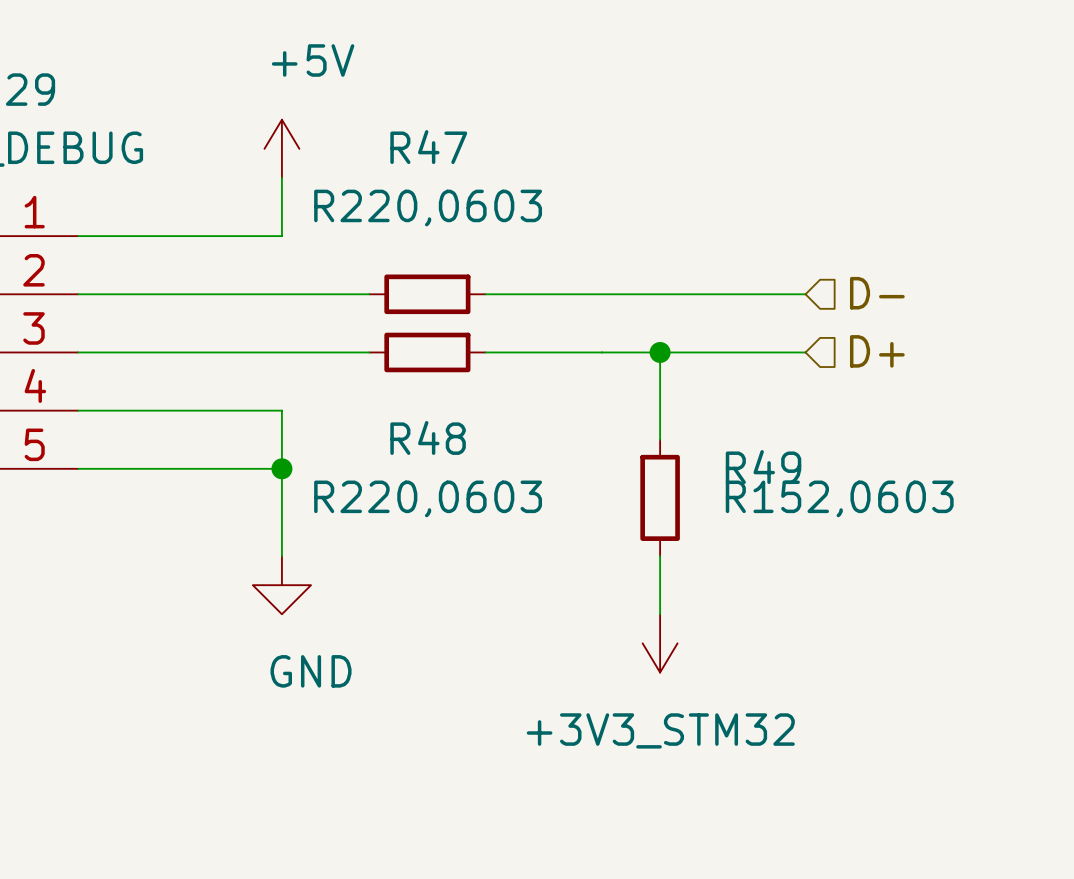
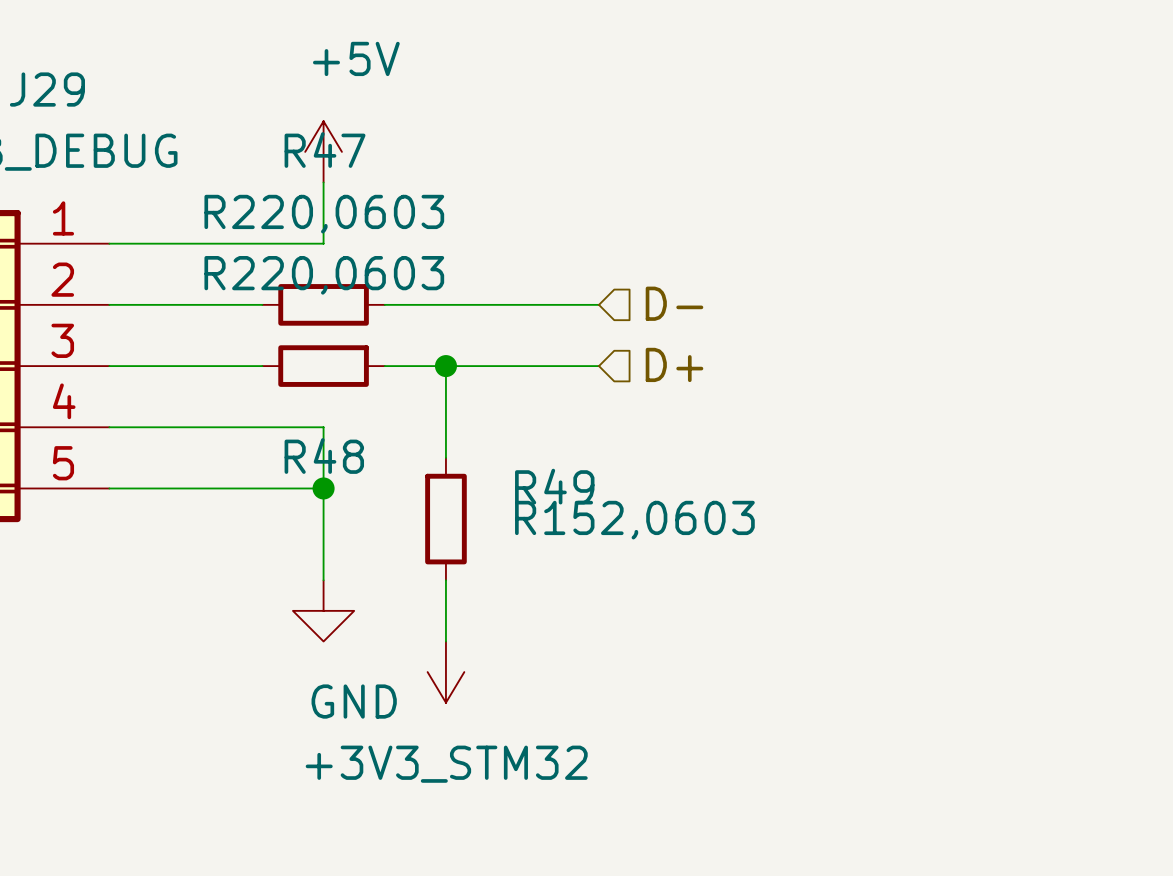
hierarchical label position: D- (877, 293) -> D- (674, 303)
wire: (223, 294) (340, 294) -> (415, 304) (537, 304)
R47 position: (427, 294) -> (323, 304)
wire: (543, 294) (805, 294) -> none
hierarchical label position: D+ (877, 351) -> D+ (674, 364)
wire: (223, 352) (340, 352) -> (415, 366) (537, 366)
junction: none -> (445, 366)
R48 position: (427, 352) -> (323, 366)
wire: (543, 352) (805, 352) -> none
wire: (660, 352) (660, 439) -> (445, 366) (445, 457)
junction: (660, 352) -> none
R49 position: (660, 497) -> (445, 519)
R48 value position: R220,0603 (428, 498) -> R220,0603 (324, 275)
wire: (660, 556) (660, 614) -> (445, 580) (445, 641)
power symbol position: +3V3_STM32 (660, 643) -> +3V3_STM32 (445, 672)

